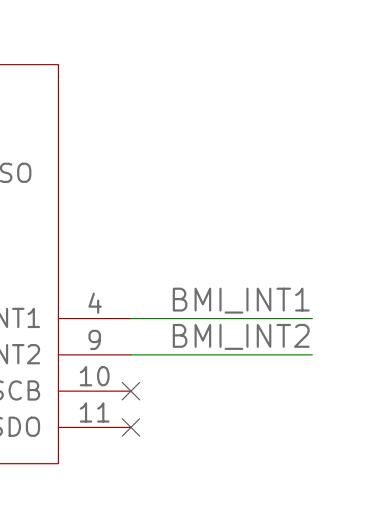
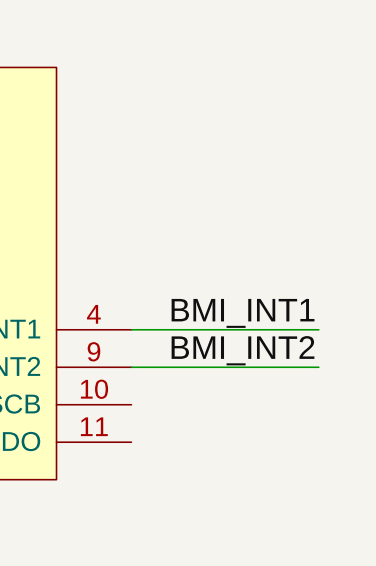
no-connect mark: (130, 391) -> none
no-connect mark: (130, 427) -> none

